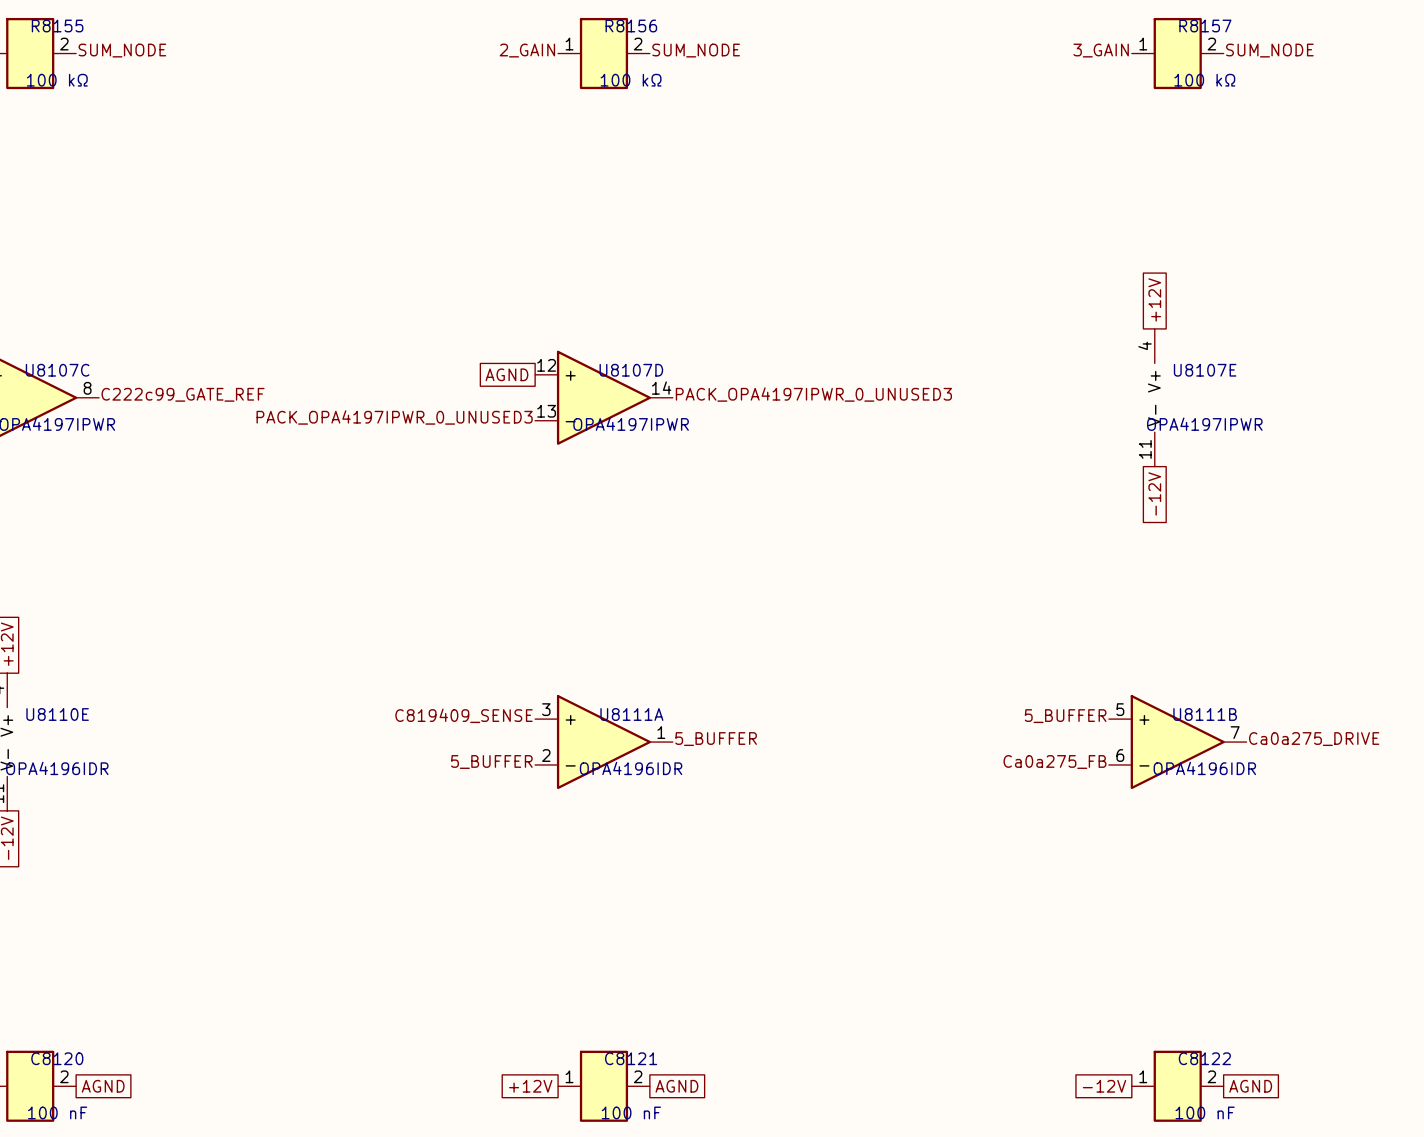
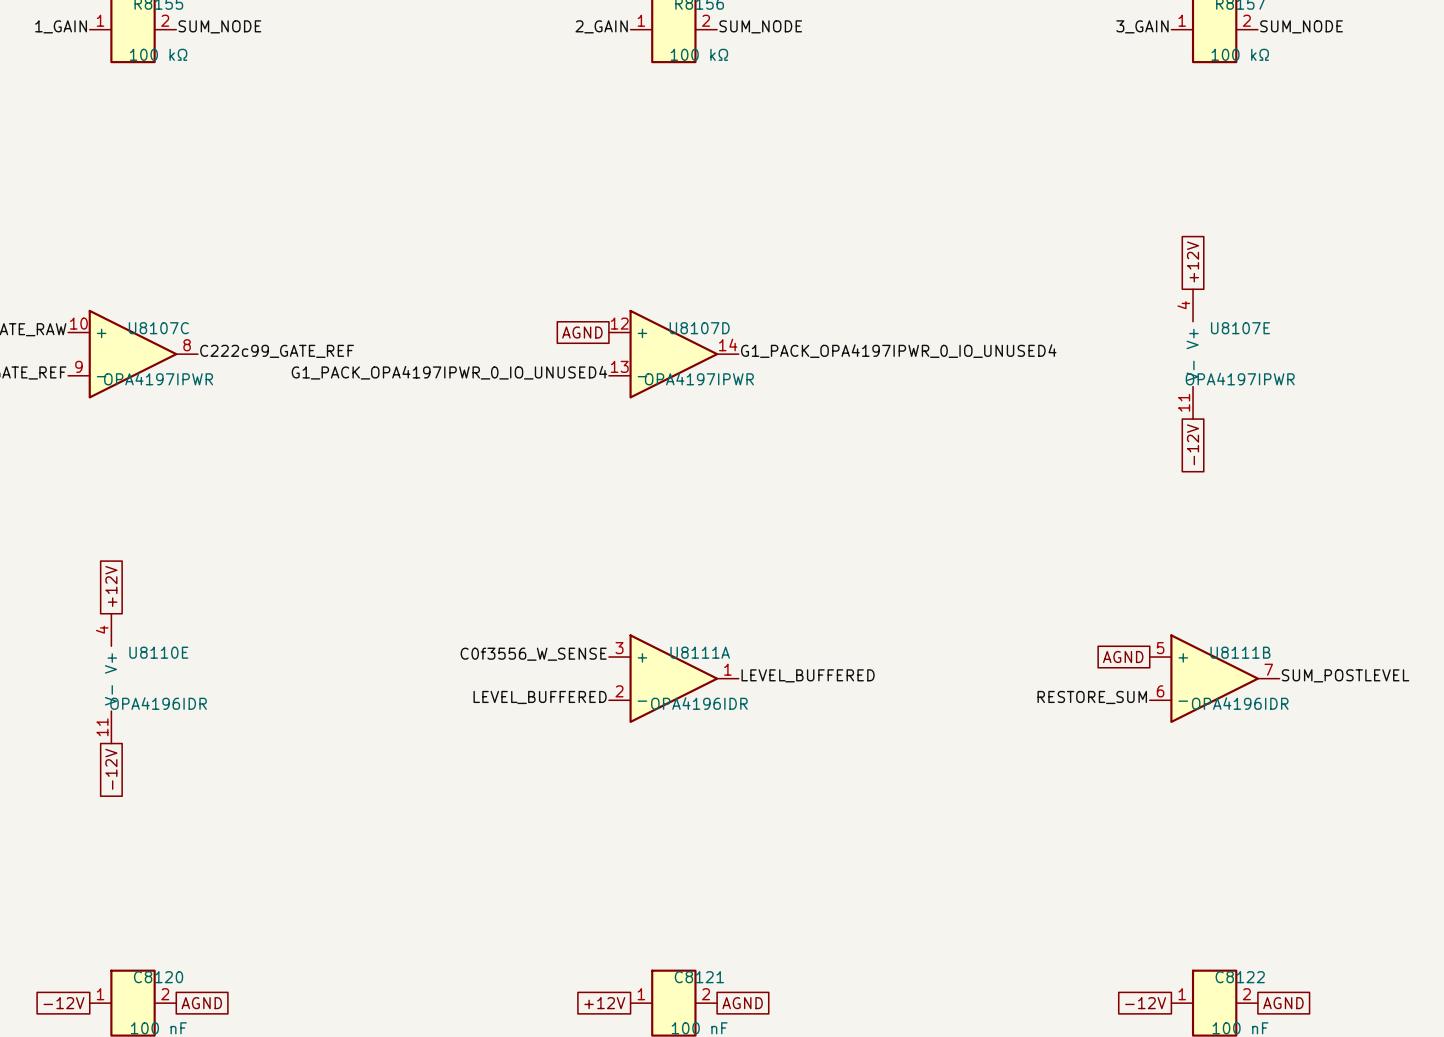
label: PACK_OPA4197IPWR_0_UNUSED3 (813, 394) -> G1_PACK_OPA4197IPWR_0_IO_UNUSED4 (898, 351)
label: PACK_OPA4197IPWR_0_UNUSED3 (394, 417) -> G1_PACK_OPA4197IPWR_0_IO_UNUSED4 (449, 372)
label: C819409_SENSE (464, 715) -> C0f3556_W_SENSE (533, 654)
label: 5_BUFFER (1065, 716) -> none
global label: none -> AGND (1123, 657)
label: 5_BUFFER (716, 739) -> LEVEL_BUFFERED (808, 675)
label: Ca0a275_DRIVE (1314, 739) -> SUM_POSTLEVEL (1345, 675)
label: 5_BUFFER (491, 762) -> LEVEL_BUFFERED (540, 697)
label: Ca0a275_FB (1054, 762) -> RESTORE_SUM (1092, 697)

